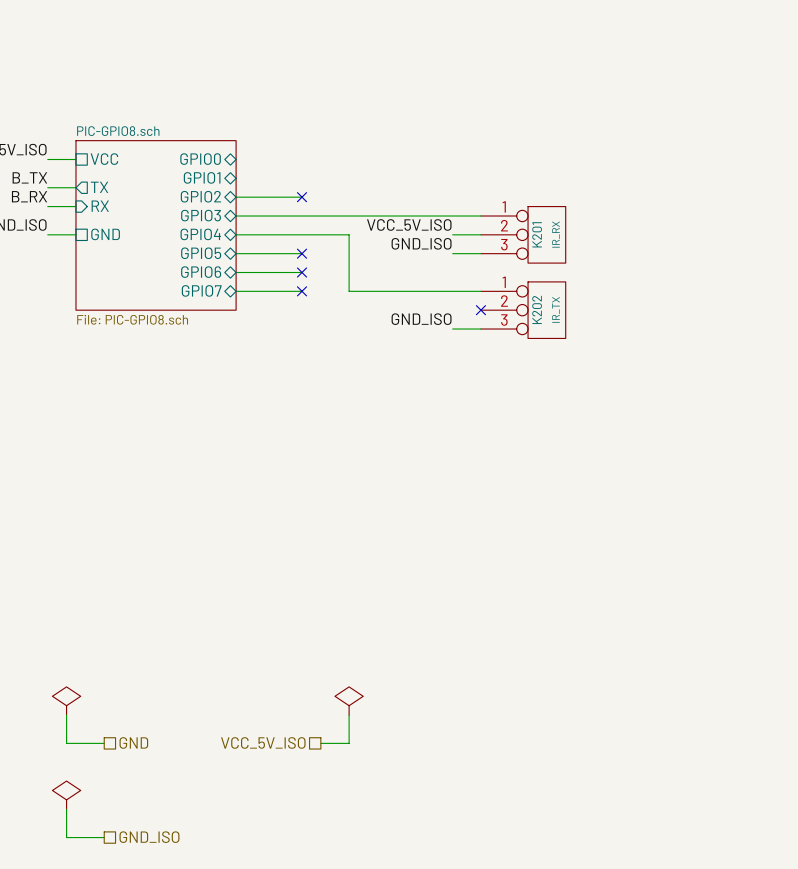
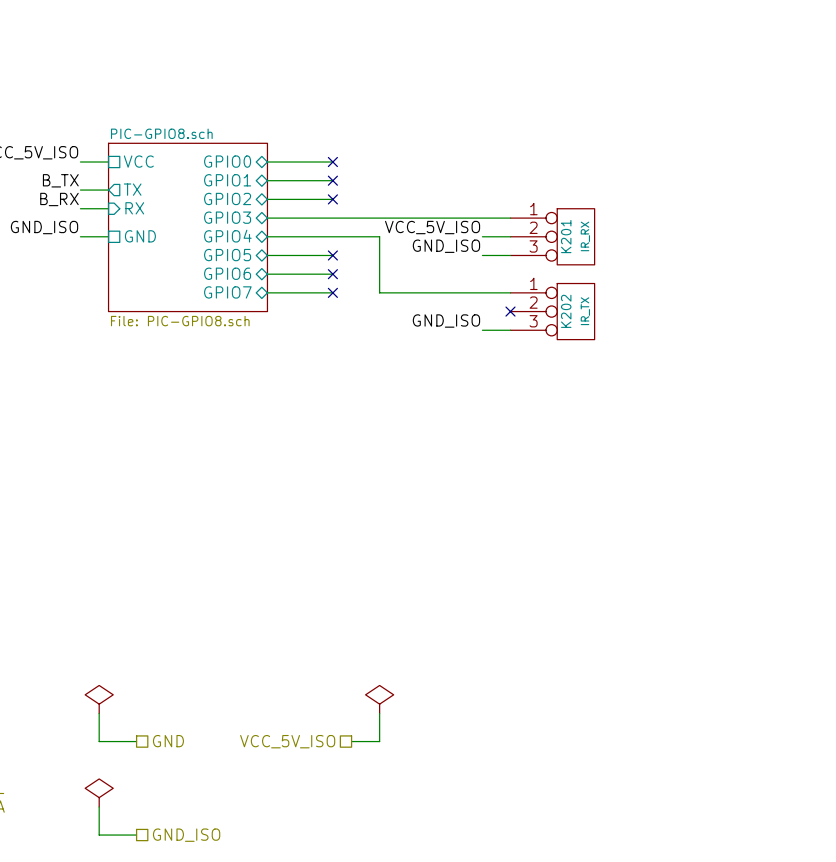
wire: none -> (267, 162) (332, 162)
no-connect mark: none -> (332, 162)
wire: none -> (267, 180) (332, 180)
no-connect mark: none -> (332, 180)

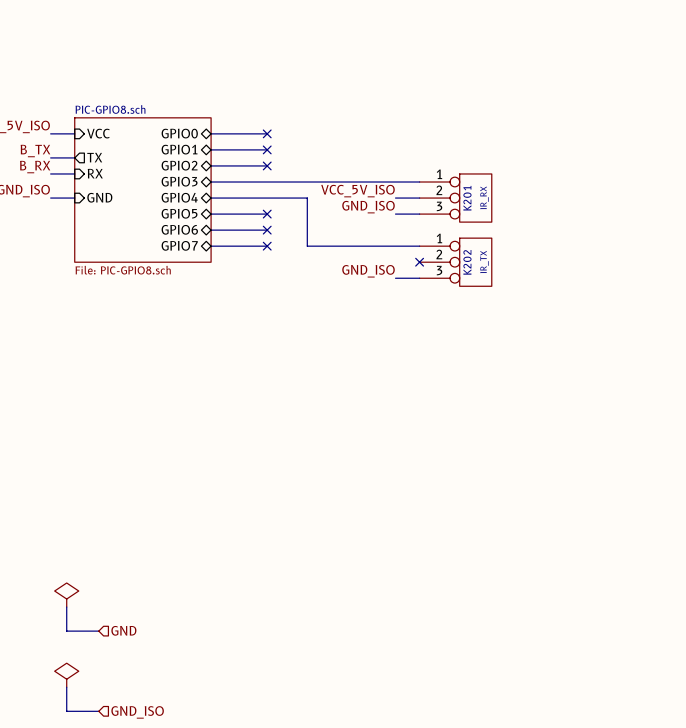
sheet pin shape: passive (138, 161) -> input (98, 133)
sheet pin shape: passive (140, 236) -> input (99, 197)
power symbol: (379, 699) -> none
wire: (379, 713) (379, 741) (351, 741) -> none
hierarchical label shape: passive (168, 741) -> input (123, 630)
hierarchical label: VCC_5V_ISO (287, 741) -> none
hierarchical label shape: passive (186, 835) -> input (137, 712)

